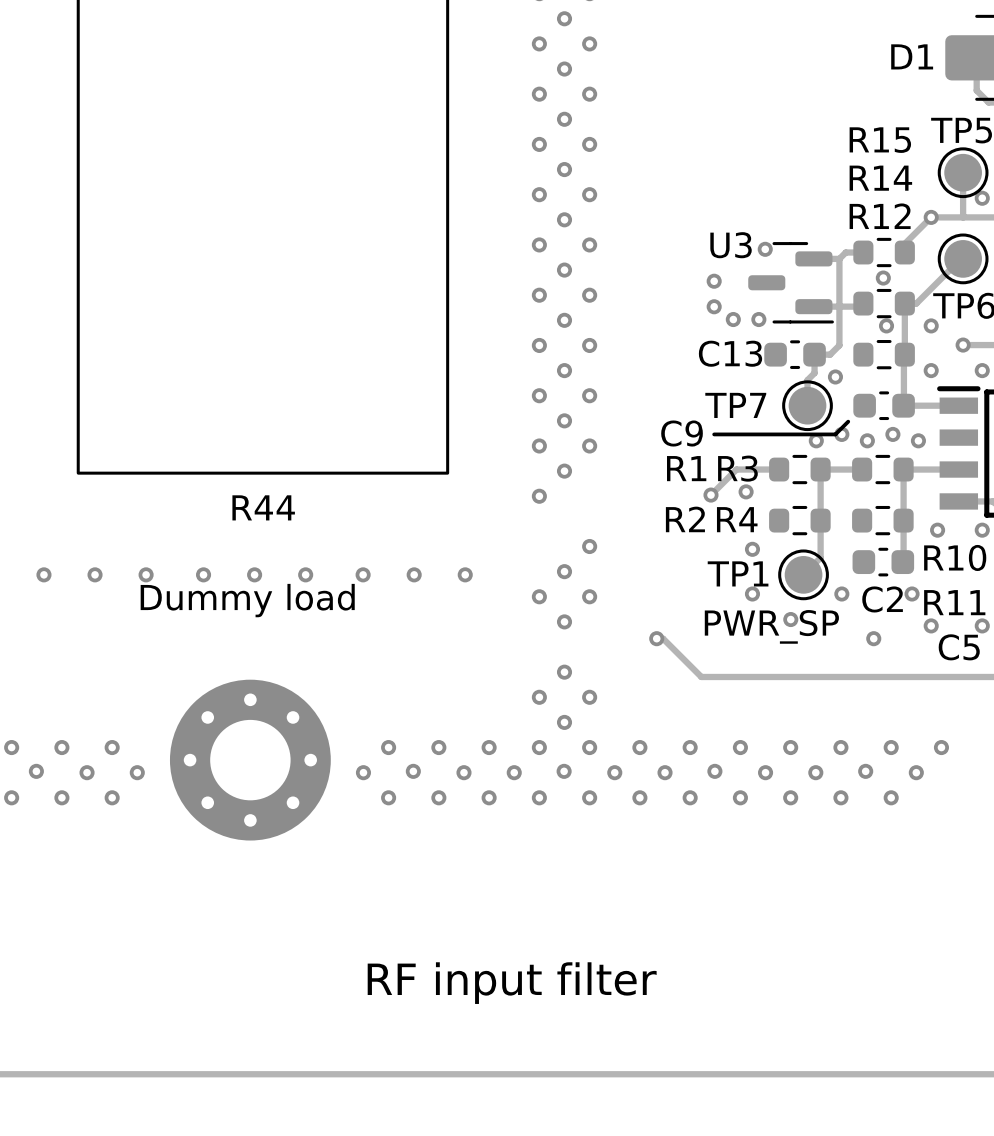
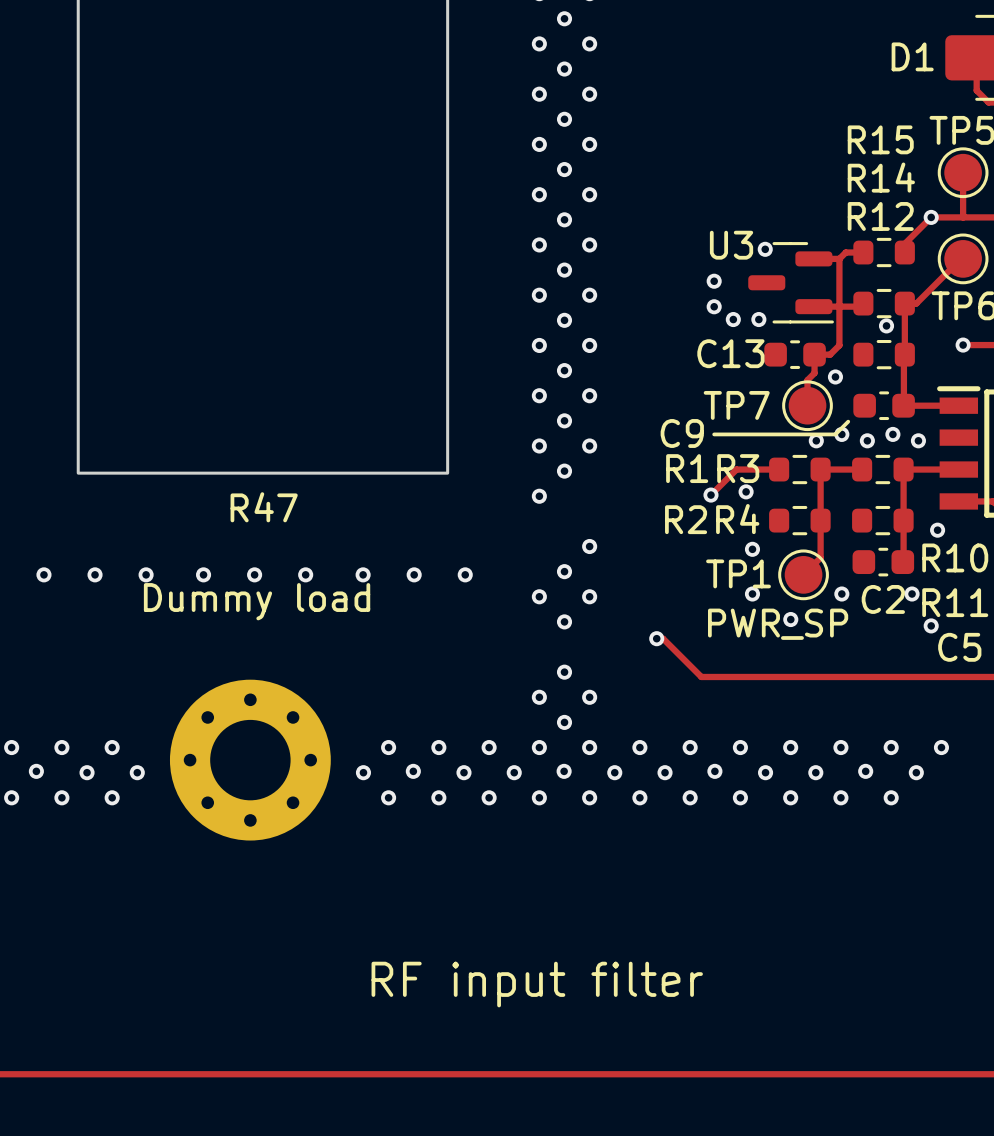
via: (982, 198) -> none
via: (883, 278) -> none
via: (931, 325) -> none
via: (931, 370) -> none
via: (982, 370) -> none
R44 name: R44 (263, 507) -> R47 (264, 507)
via: (982, 530) -> none
via: (982, 625) -> none
via: (873, 638) -> none

